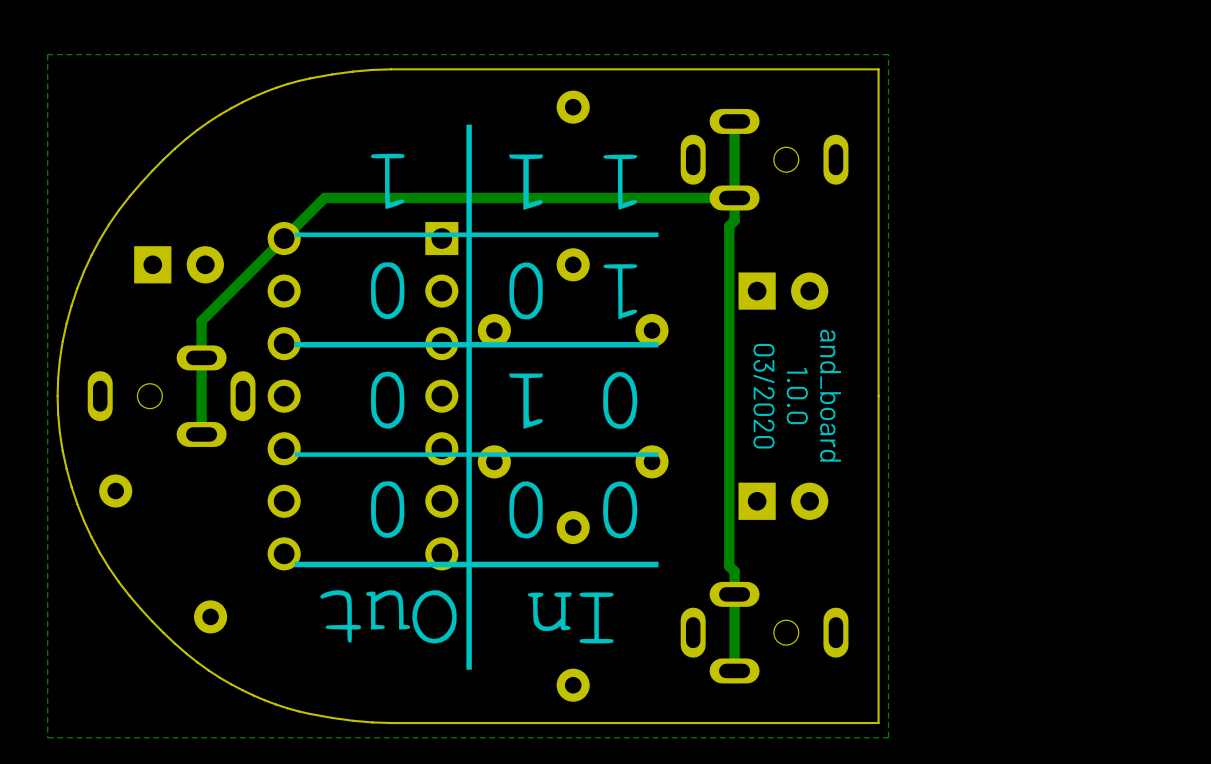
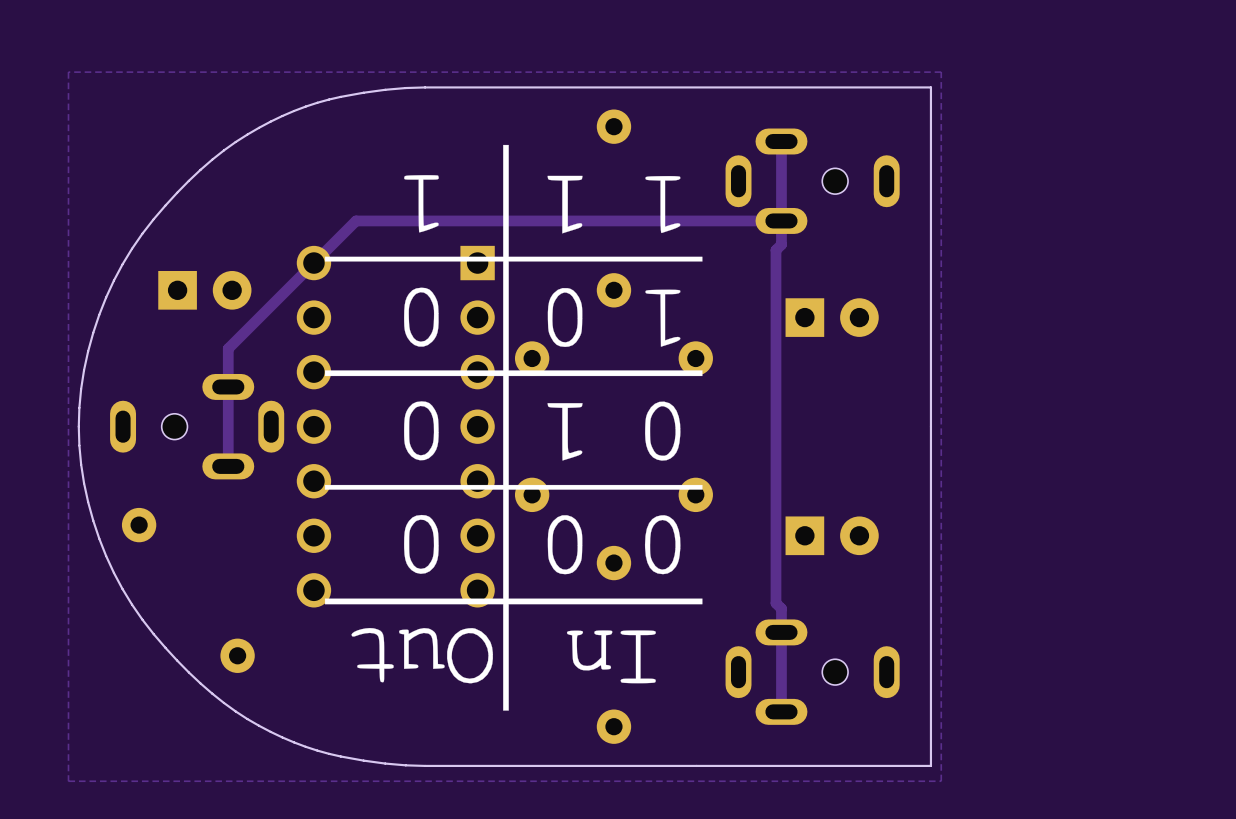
text: 1.0.0 (797, 395) -> none
text: and_board (830, 395) -> none
text: 03/2020 (763, 396) -> none

